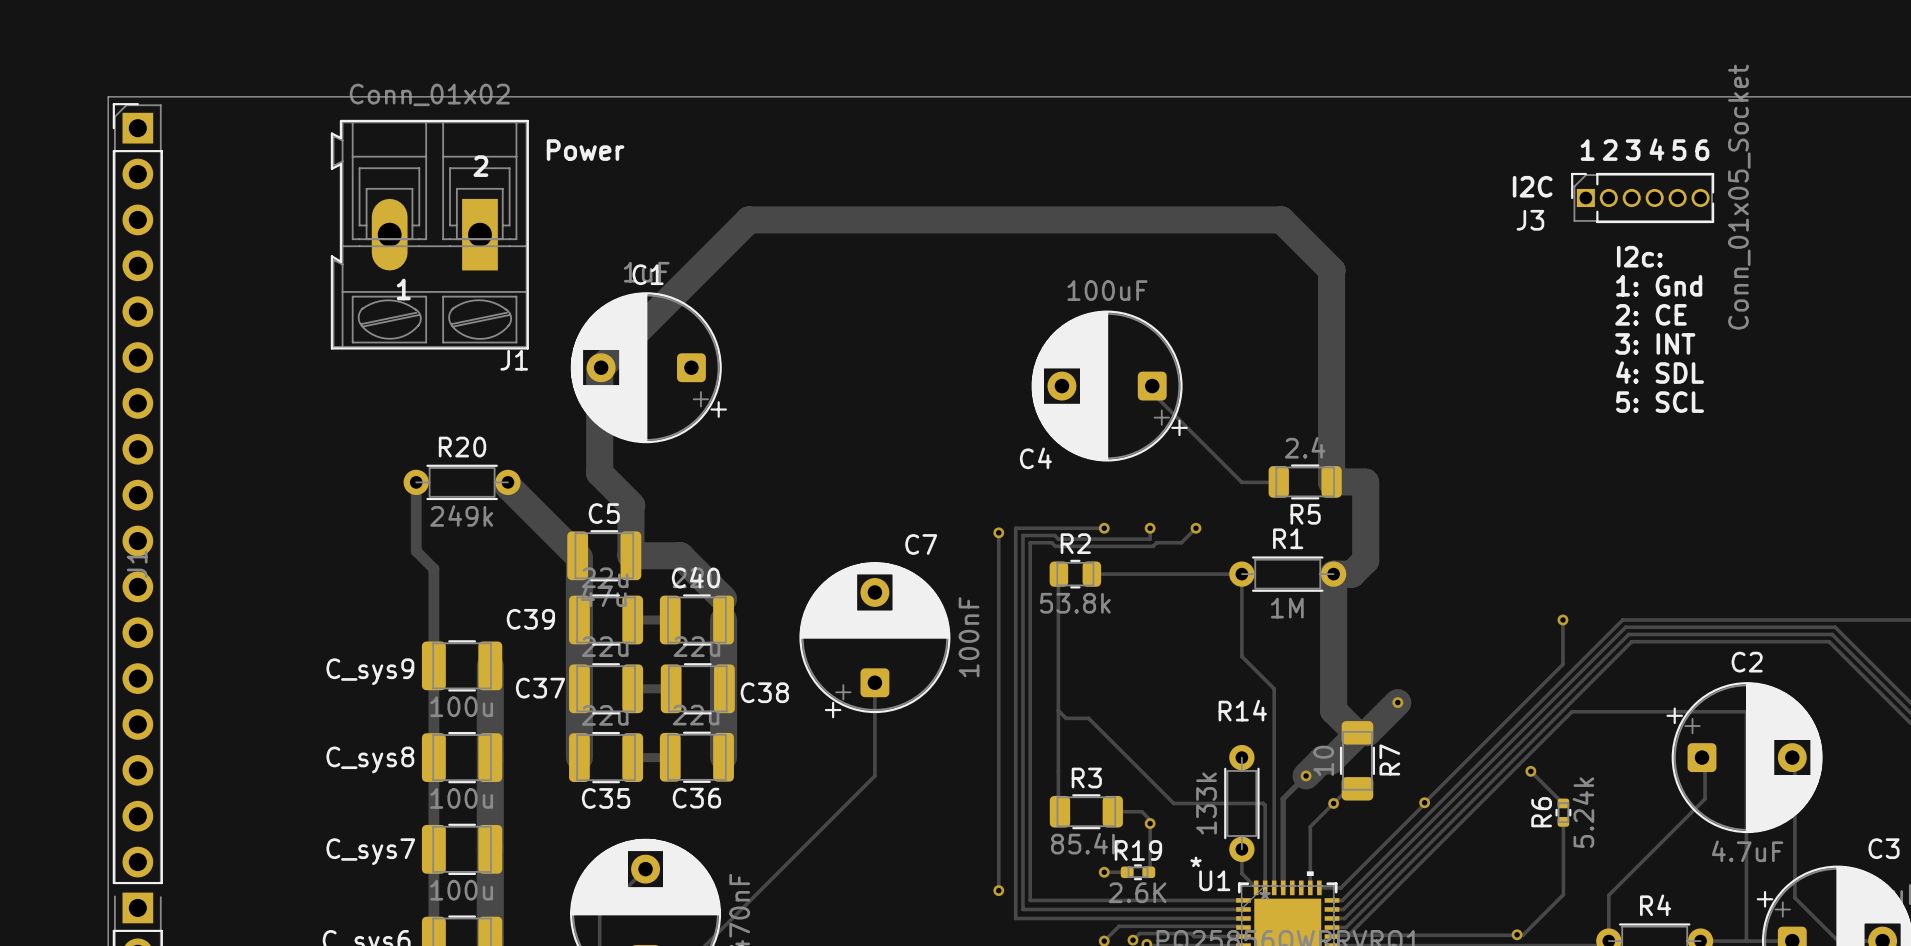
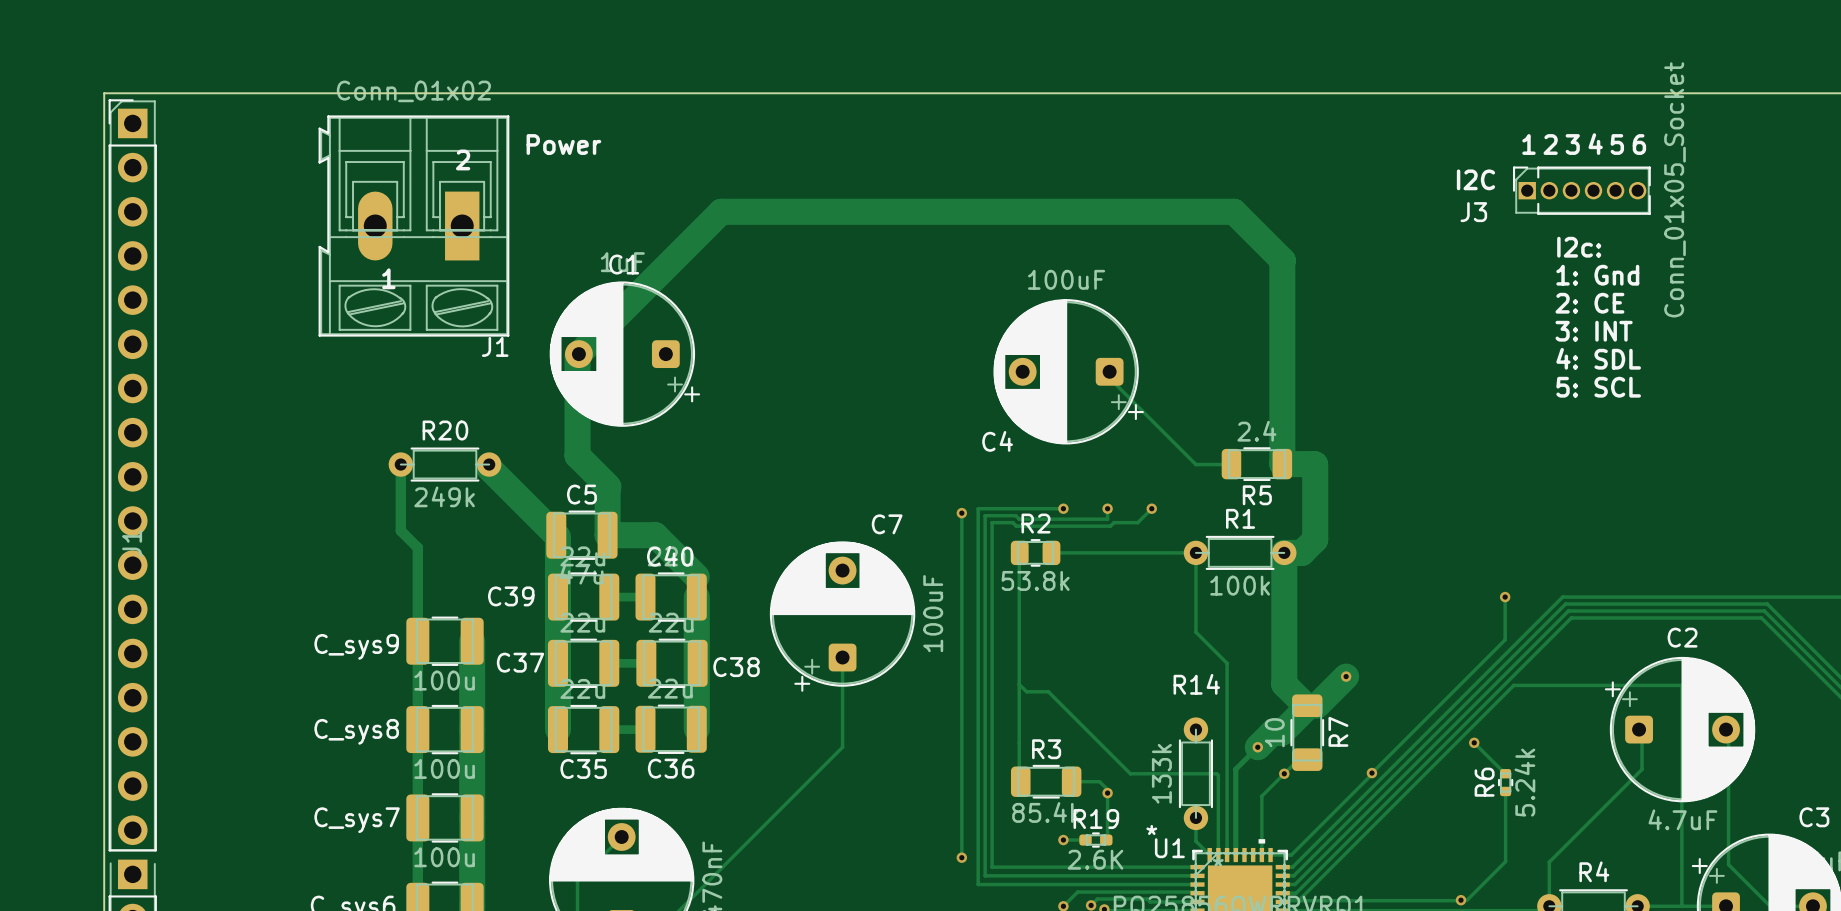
R1 value: 1M (1287, 608) -> 100k (1240, 585)
C7 value: 100nF (969, 637) -> 100uF (933, 613)

